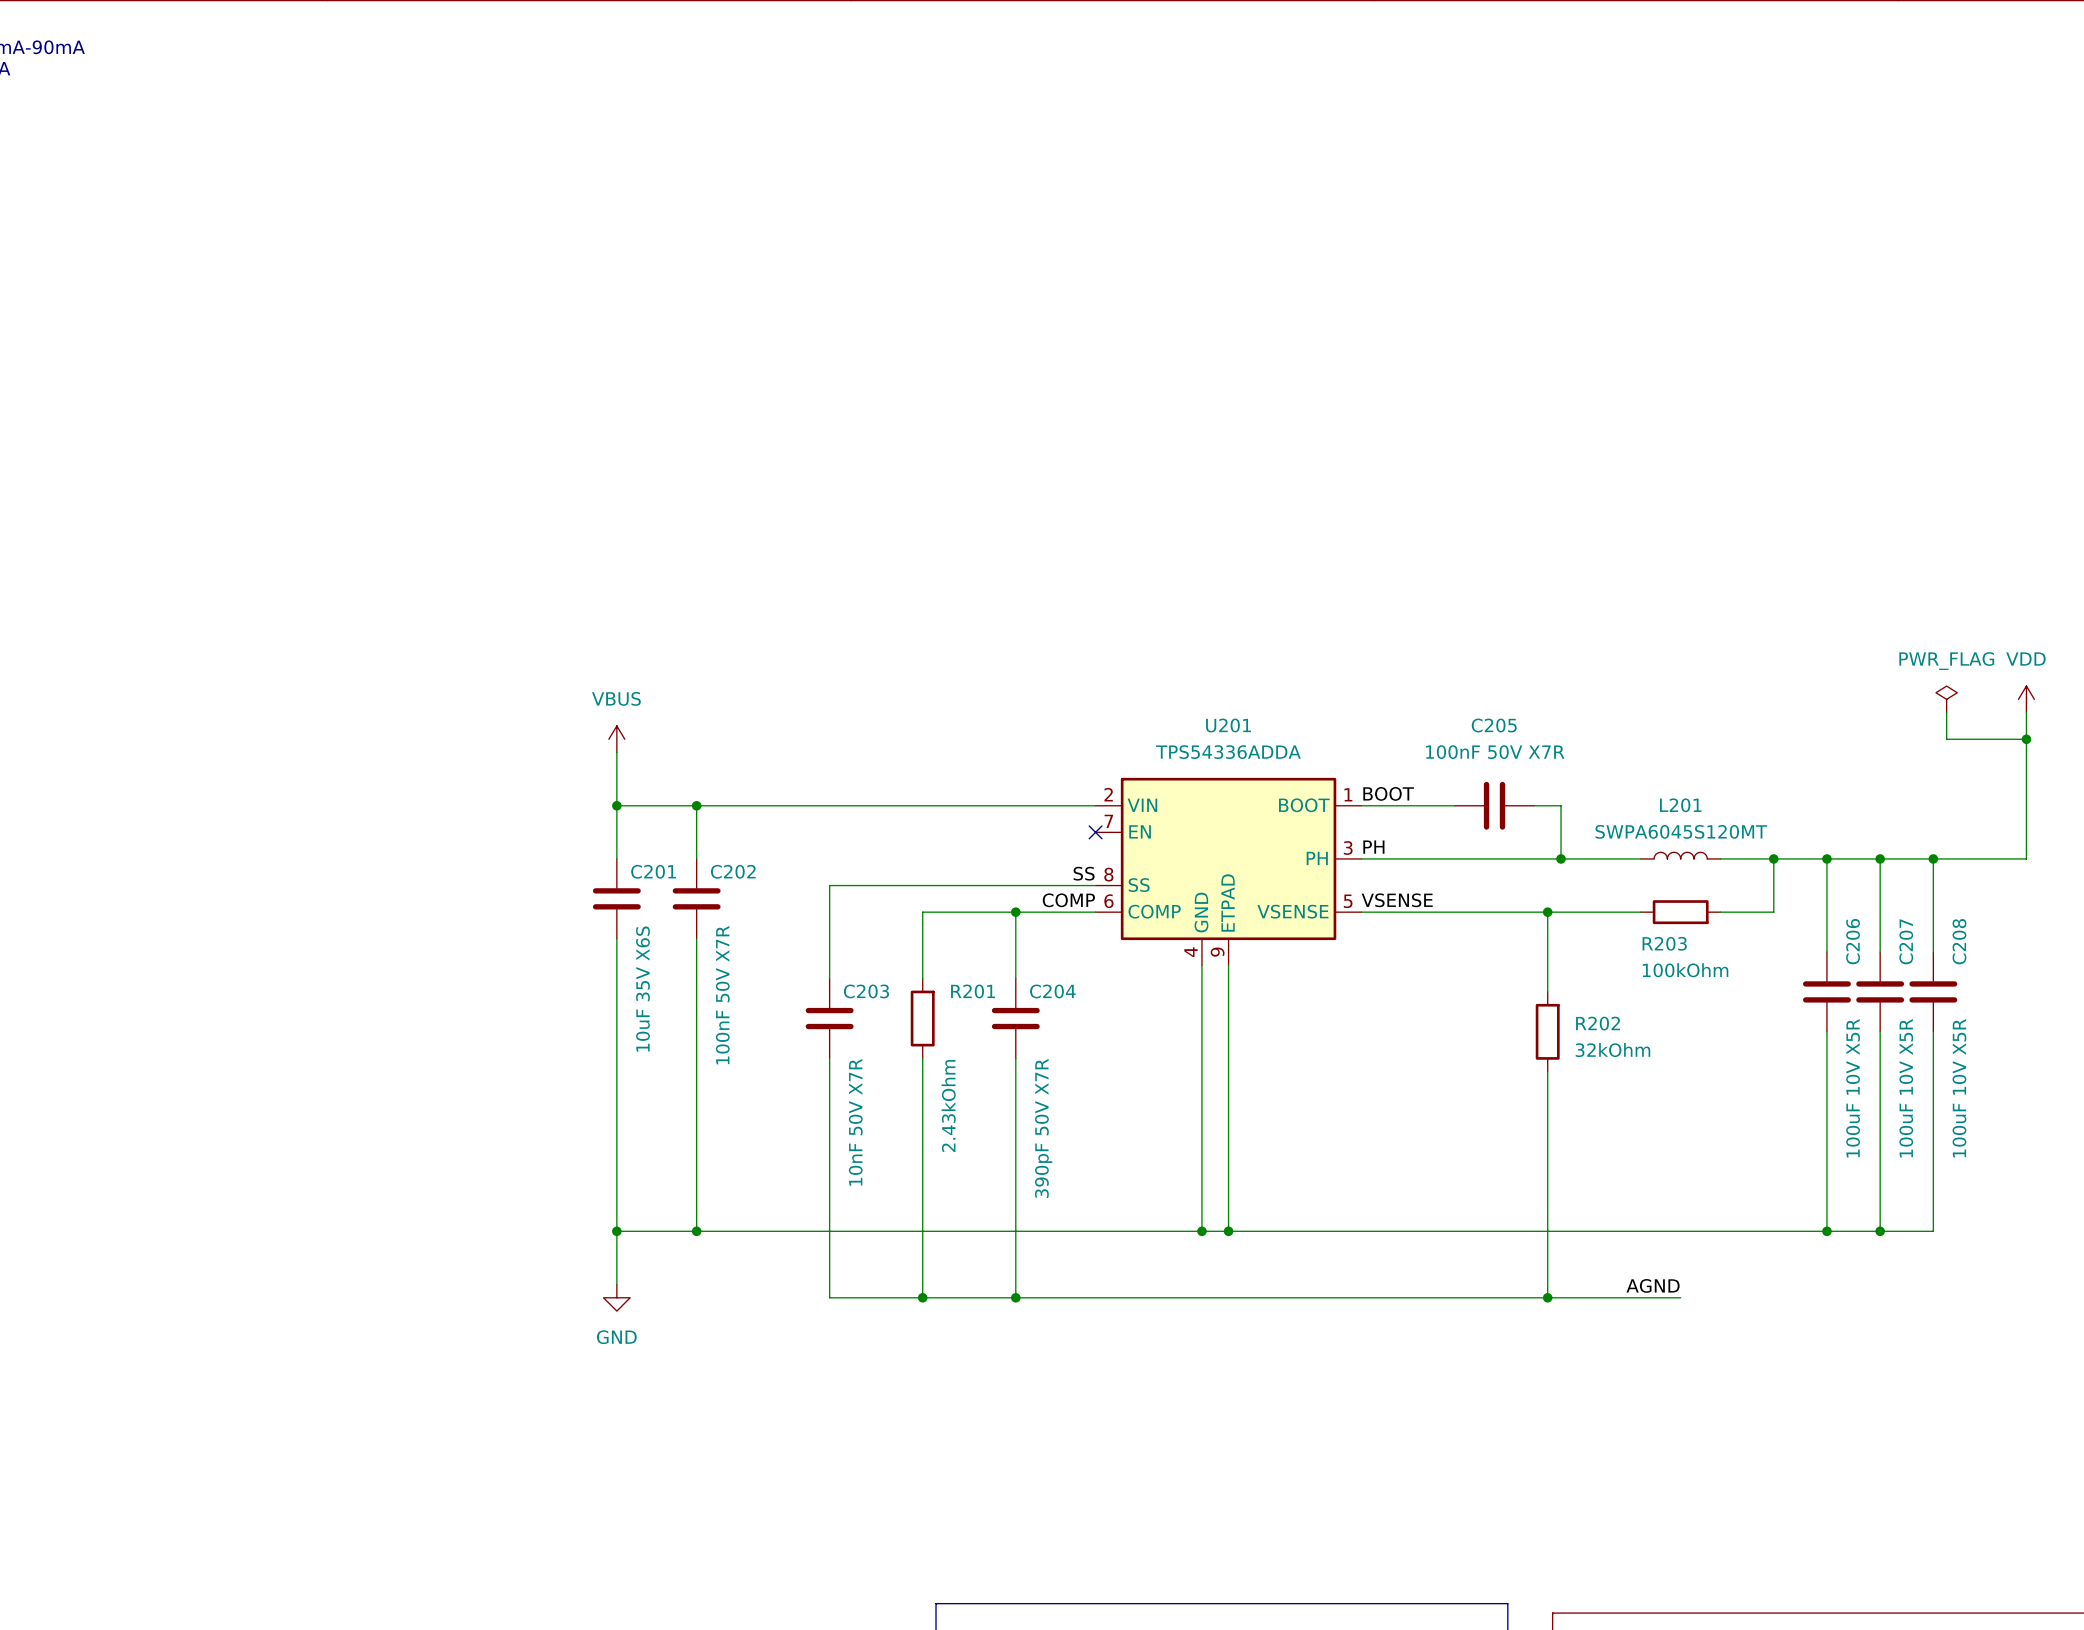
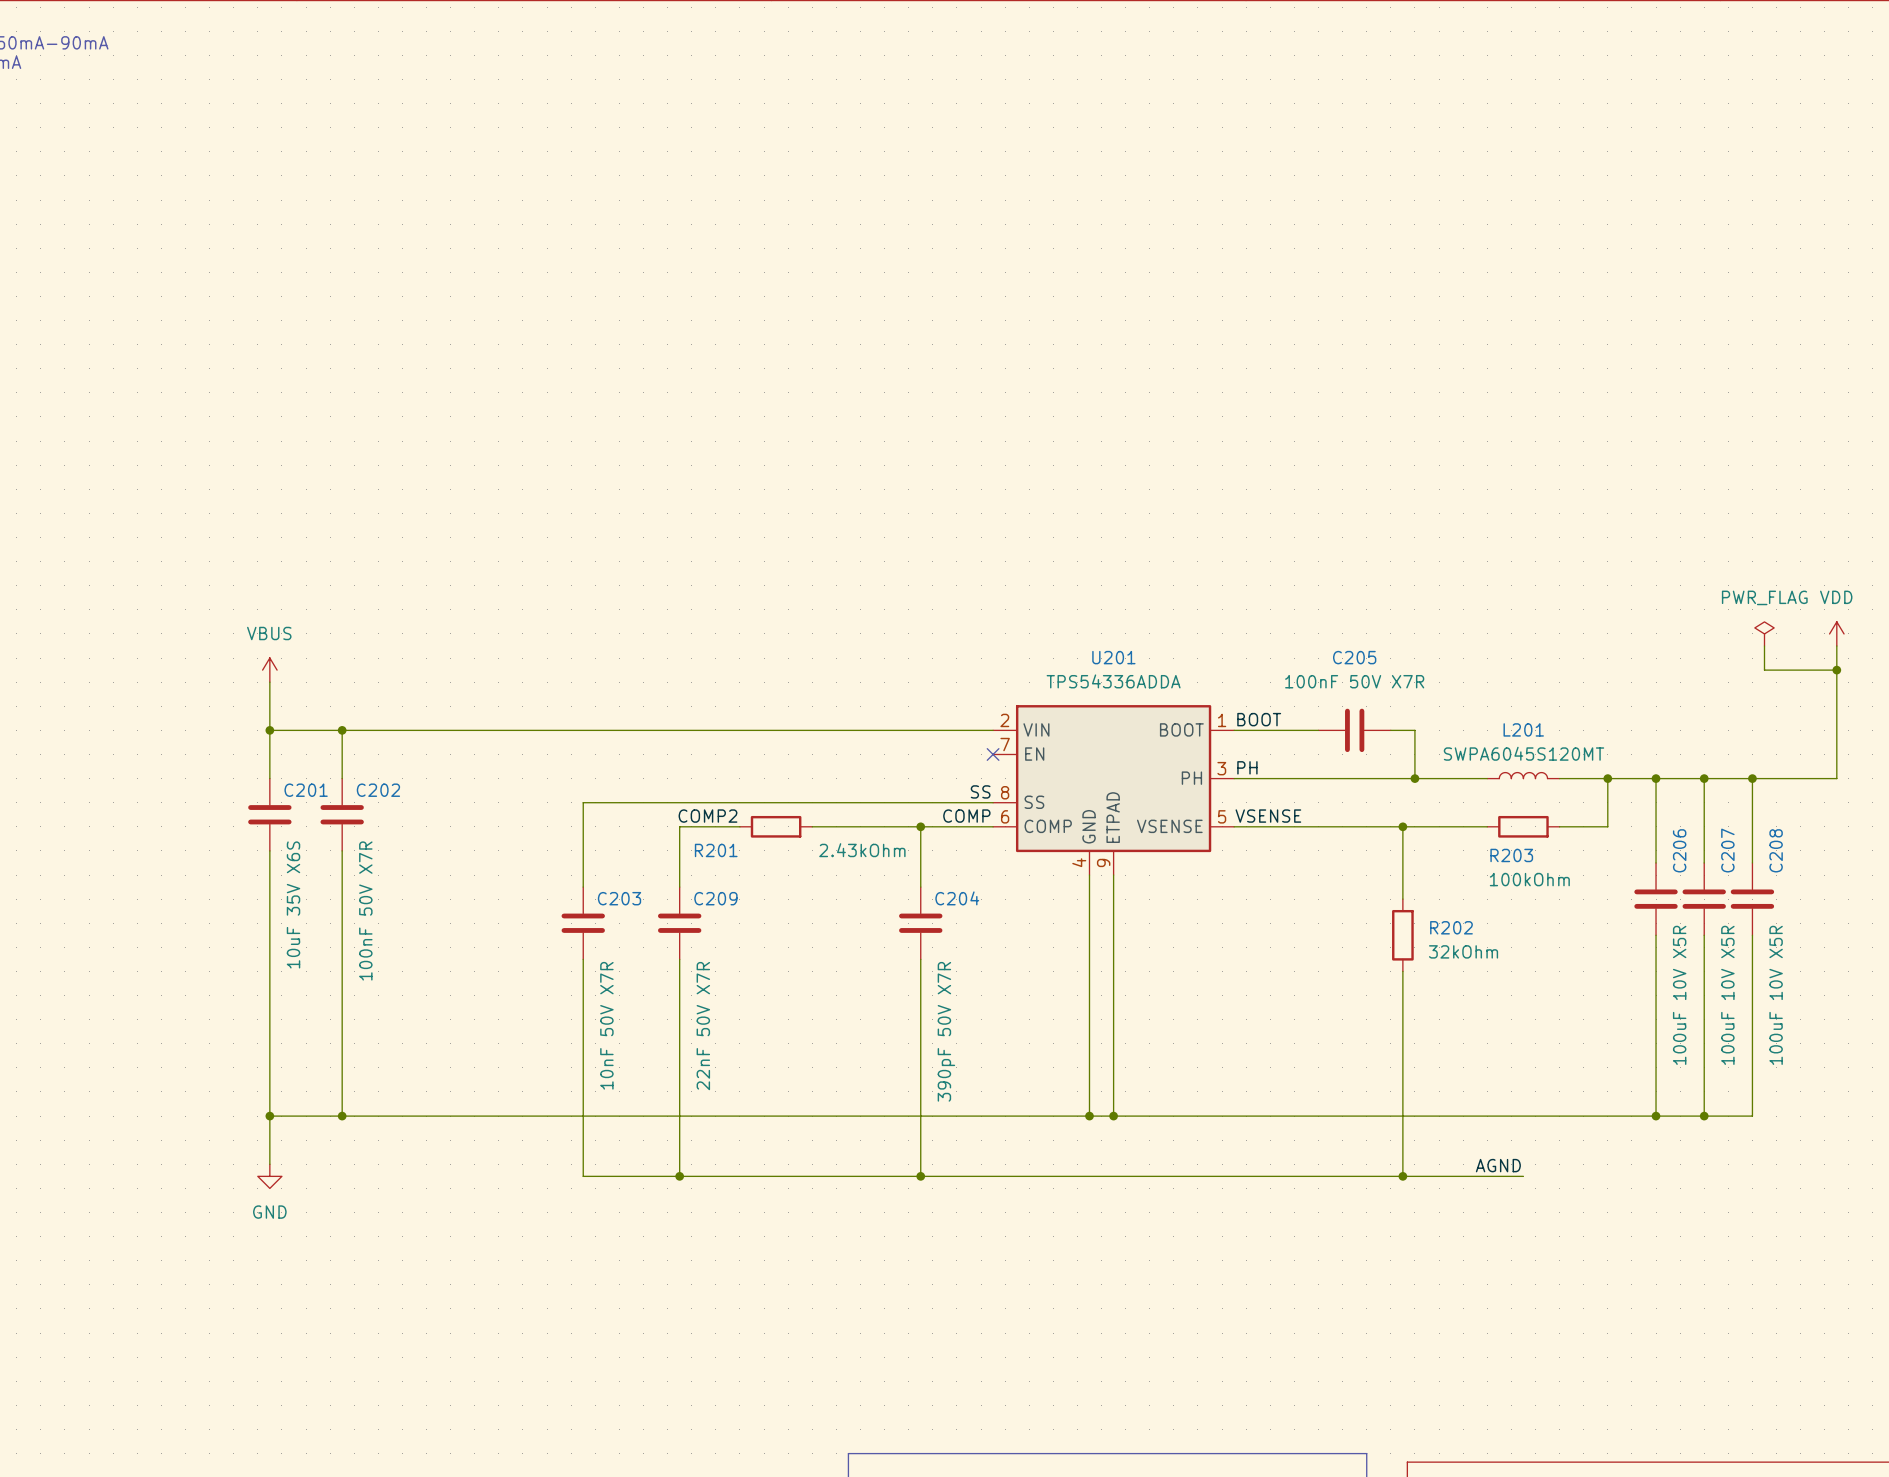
power symbol: none -> VBUS (269, 670)
power symbol: VBUS (616, 739) -> none
wire: none -> (269, 682) (269, 778)
wire: (616, 752) (616, 858) -> none
wire: none -> (269, 730) (559, 730)
junction: none -> (269, 730)
wire: none -> (342, 730) (342, 778)
junction: none -> (342, 730)
junction: (616, 805) -> none
wire: (696, 805) (696, 858) -> none
junction: (696, 805) -> none
wire: (829, 885) (829, 978) -> (751, 802) (583, 802) (583, 887)
C201 position: (616, 898) -> (269, 814)
C202 position: (696, 898) -> (342, 814)
label: none -> COMP2 (707, 816)
wire: none -> (739, 826) (679, 826) (679, 887)
wire: (922, 912) (922, 978) -> (836, 826) (812, 826)
wire: none -> (269, 850) (269, 1164)
wire: none -> (342, 850) (342, 1116)
wire: (616, 938) (616, 1284) -> none
wire: (696, 938) (696, 1231) -> none
R201 name position: R201 (973, 991) -> R201 (716, 850)
C209: none -> 22nF 50V X7R (679, 923)
C203 position: (829, 1018) -> (583, 923)
R201 rotation: 0° (922, 1018) -> 90° clockwise (776, 826)
R201 position: (922, 1018) -> (776, 826)
wire: (829, 1058) (829, 1297) -> (583, 959) (583, 1176) (751, 1176)
wire: (922, 1058) (922, 1297) -> (679, 959) (679, 1176)
R201 value position: 2.43kOhm (948, 1105) -> 2.43kOhm (862, 850)
wire: none -> (269, 1116) (559, 1116)
junction: none -> (269, 1116)
junction: none -> (342, 1116)
junction: (616, 1231) -> none
junction: (696, 1231) -> none
power symbol: none -> GND (269, 1176)
power symbol: GND (616, 1297) -> none
junction: none -> (679, 1176)
junction: (922, 1297) -> none

